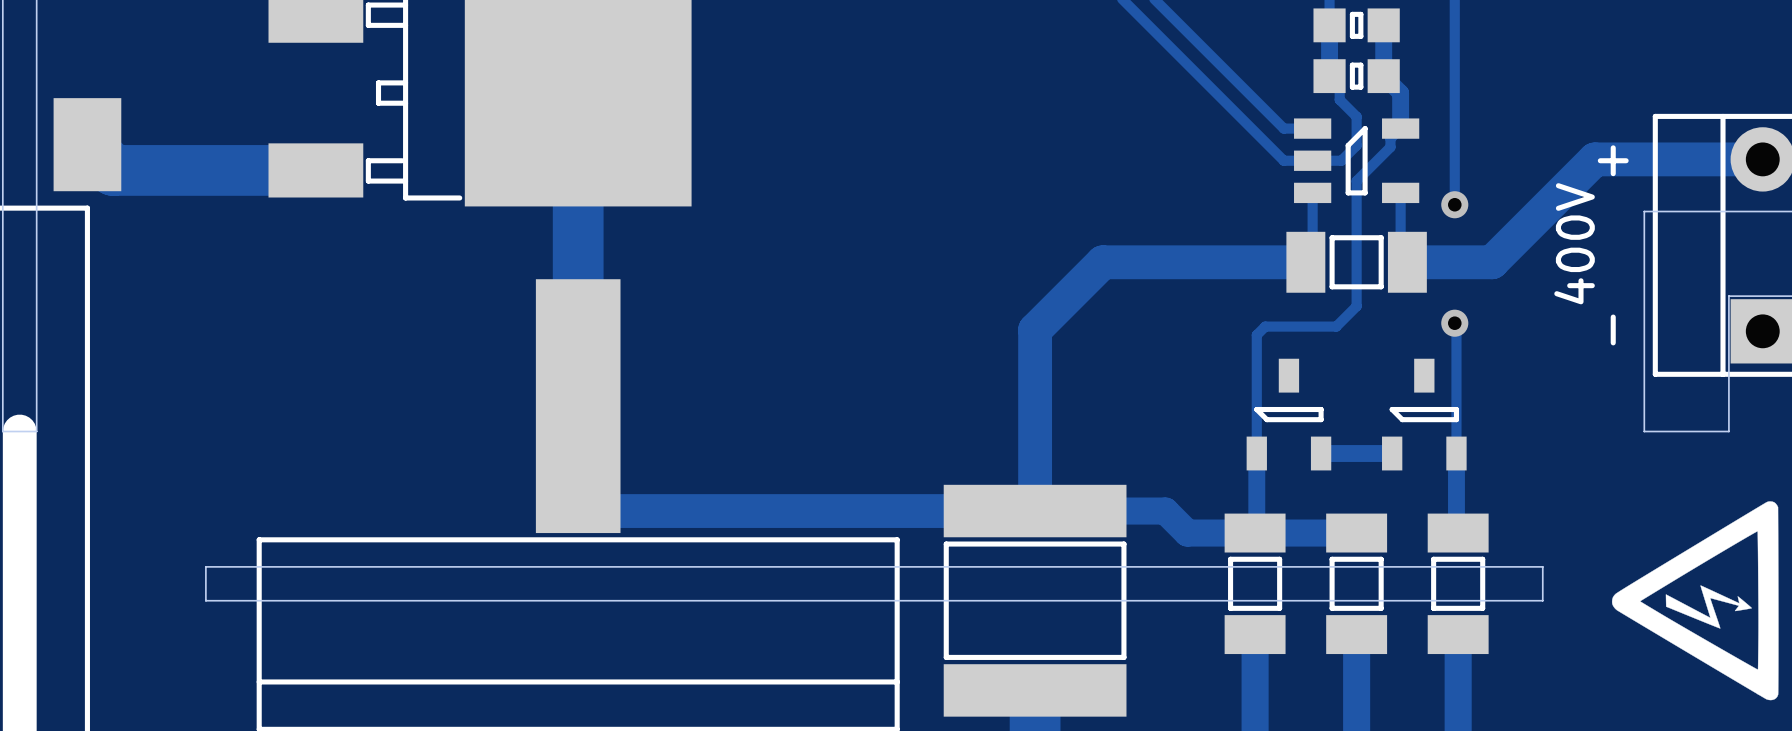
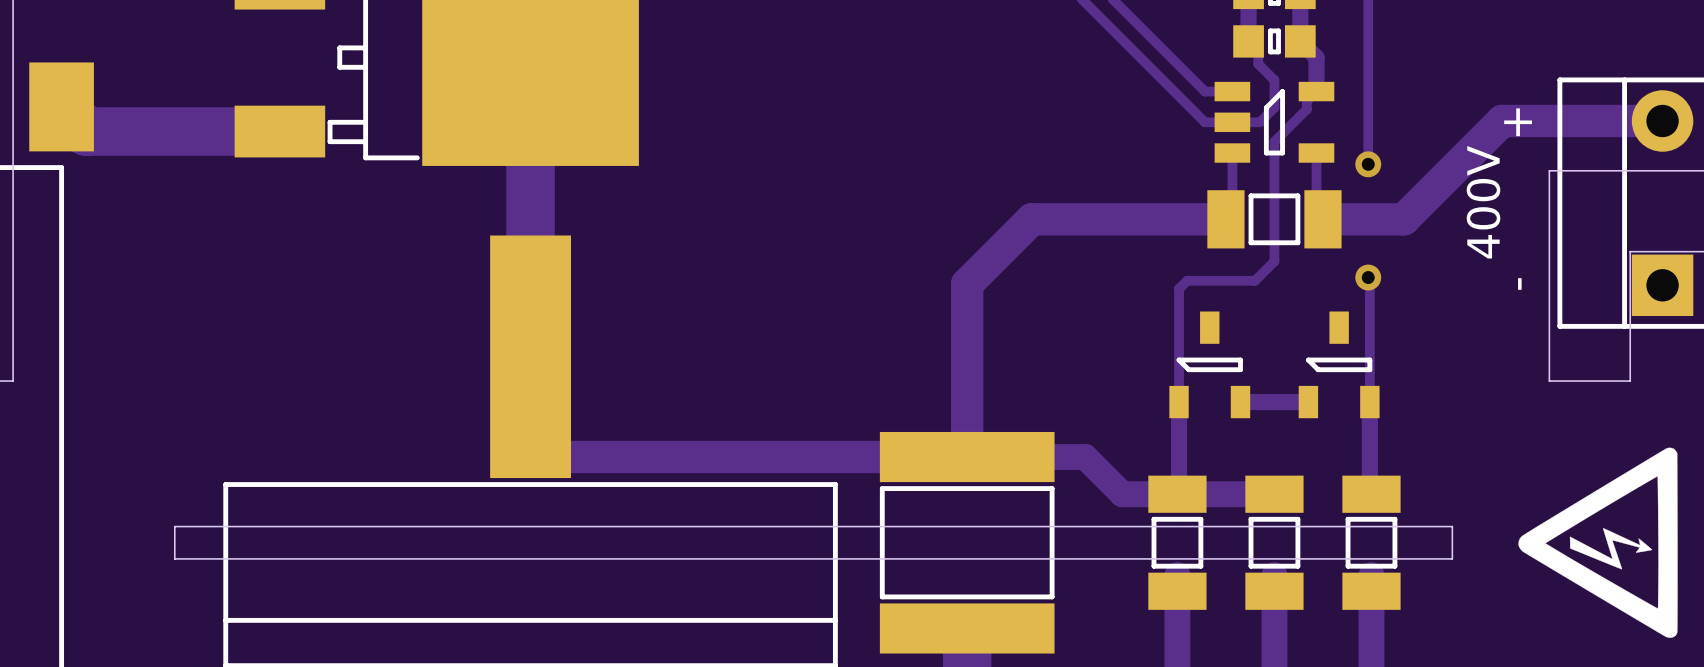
track: (1158, 511) (1165, 511) (1187, 533) (1356, 533) -> (1085, 457) (1122, 494) (1274, 494)
board edge: (205, 583) (205, 566) (1542, 566) (1542, 583) -> (174, 526) (1452, 526)
part position: (1255, 583) -> (1177, 542)
part position: (1356, 583) -> (1274, 542)
part position: (1458, 583) -> (1371, 542)
board edge: (205, 600) (1542, 600) -> (174, 542) (174, 558) (1452, 558) (1452, 542)

